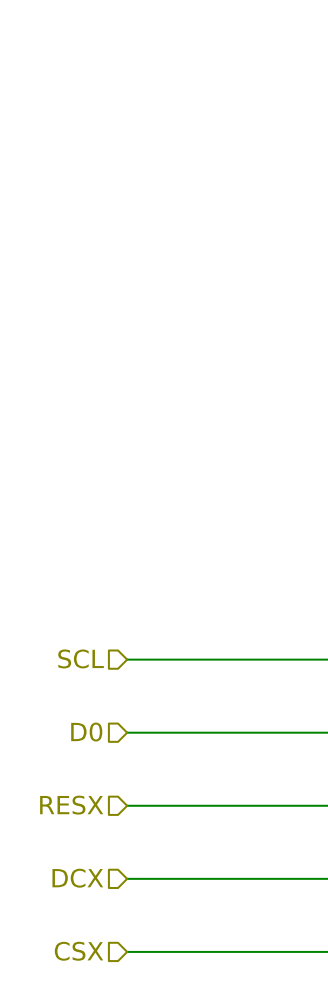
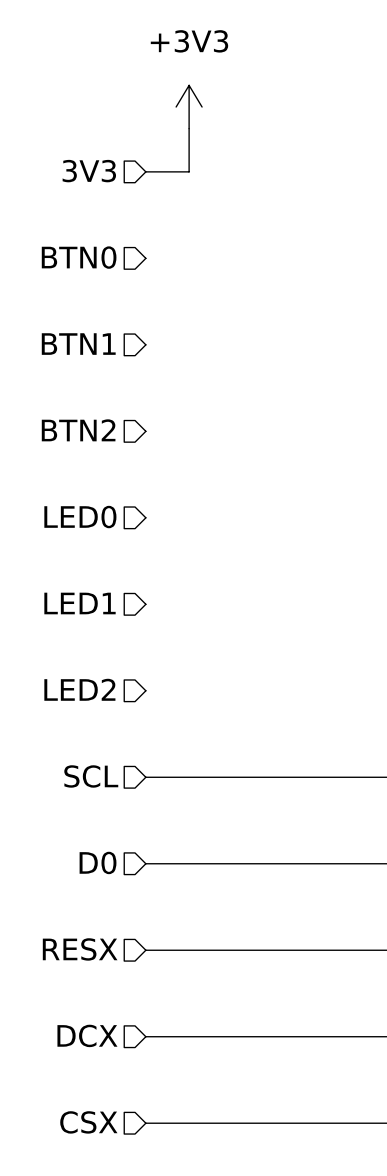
power symbol: none -> +3V3 (189, 107)
wire: none -> (189, 128) (189, 171) (145, 171)
hierarchical label: none -> 3V3 (89, 171)
hierarchical label: none -> BTN0 (79, 257)
hierarchical label: none -> BTN1 (78, 344)
hierarchical label: none -> BTN2 (78, 430)
hierarchical label: none -> LED0 (80, 517)
hierarchical label: none -> LED1 (80, 603)
hierarchical label: none -> LED2 (79, 689)

